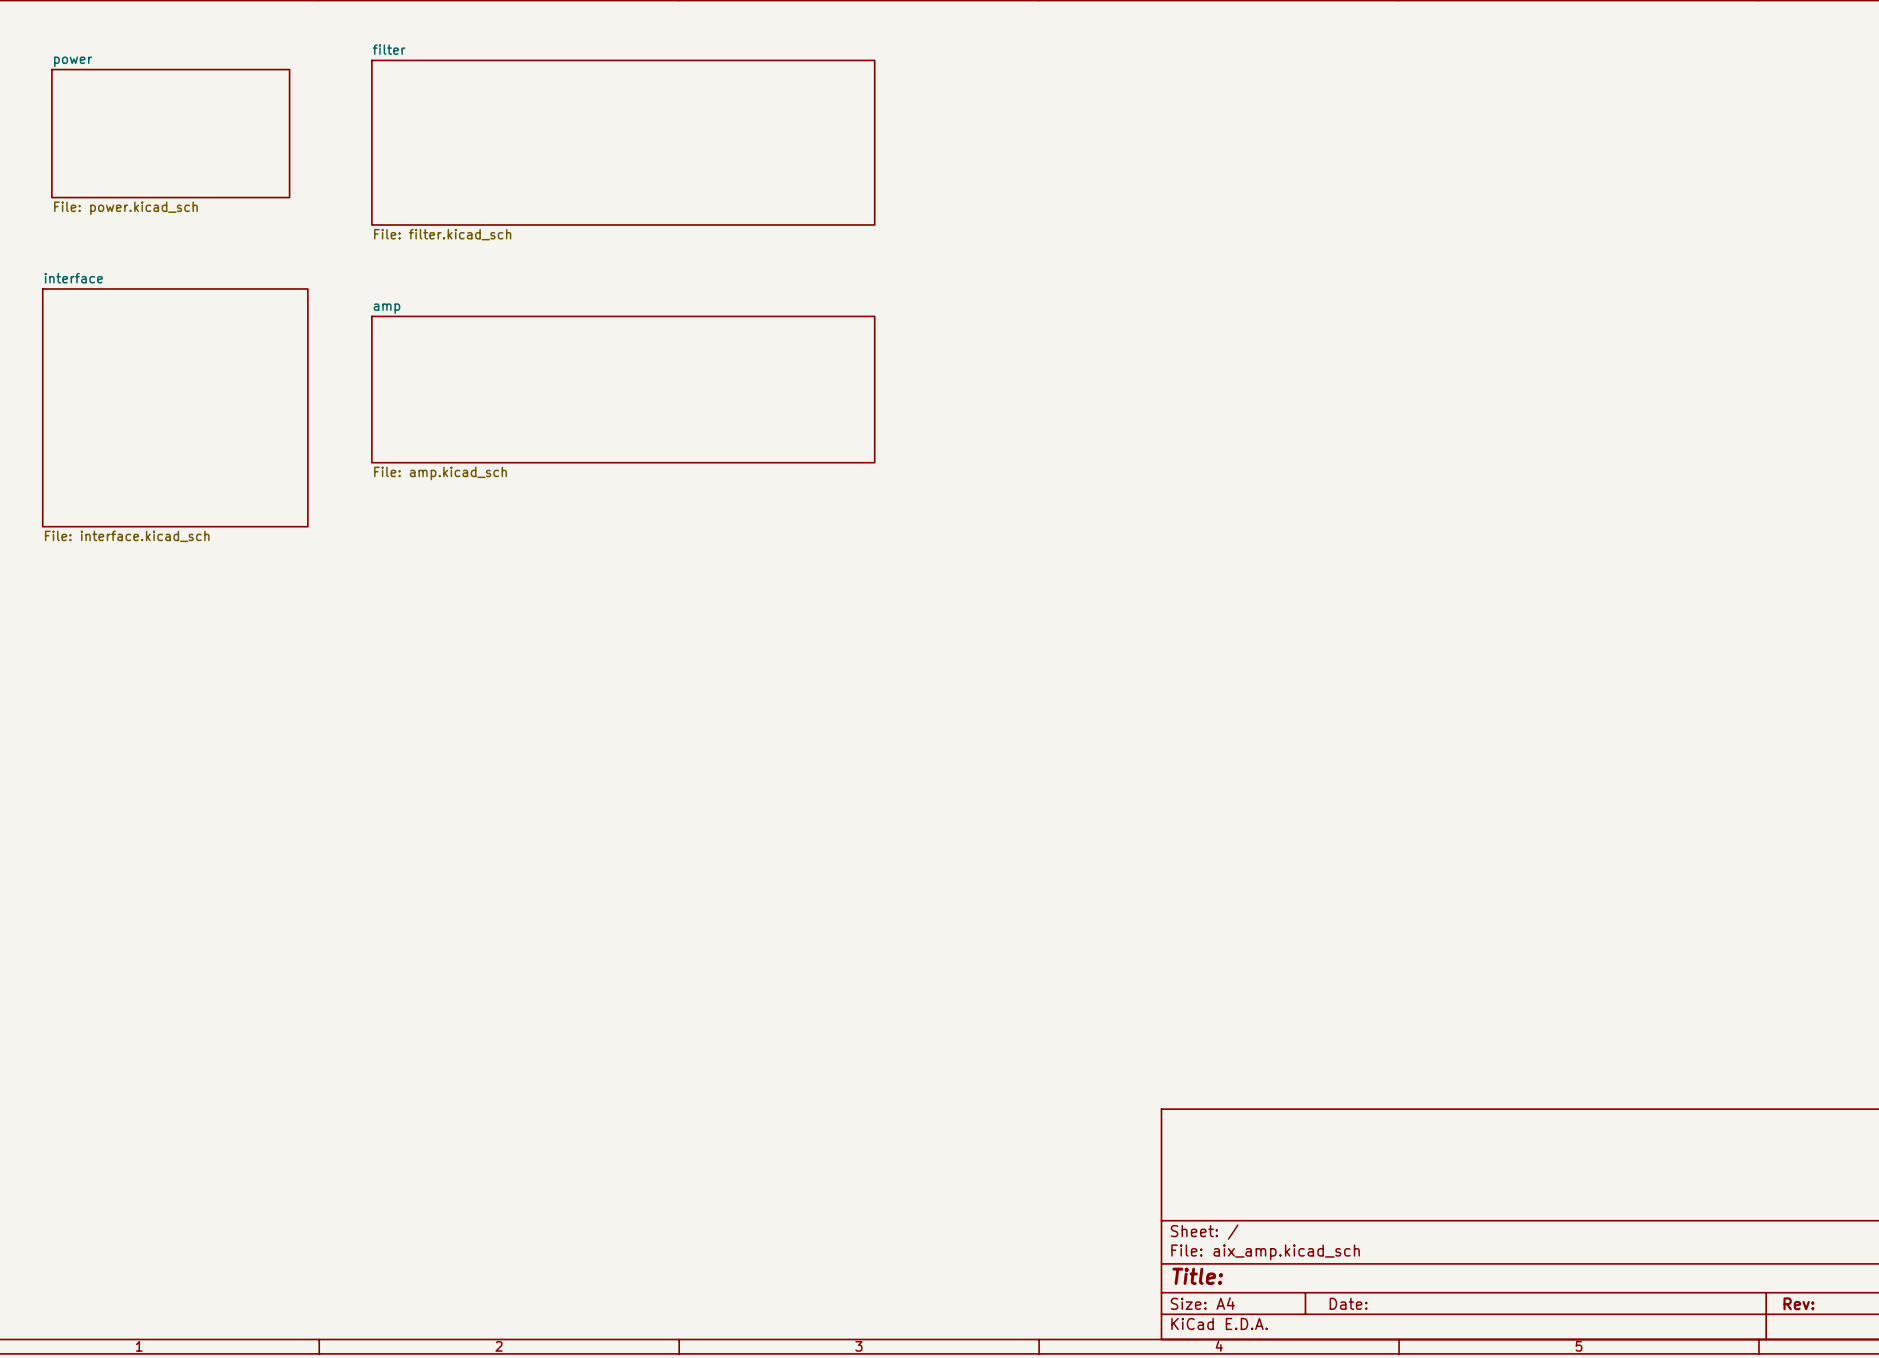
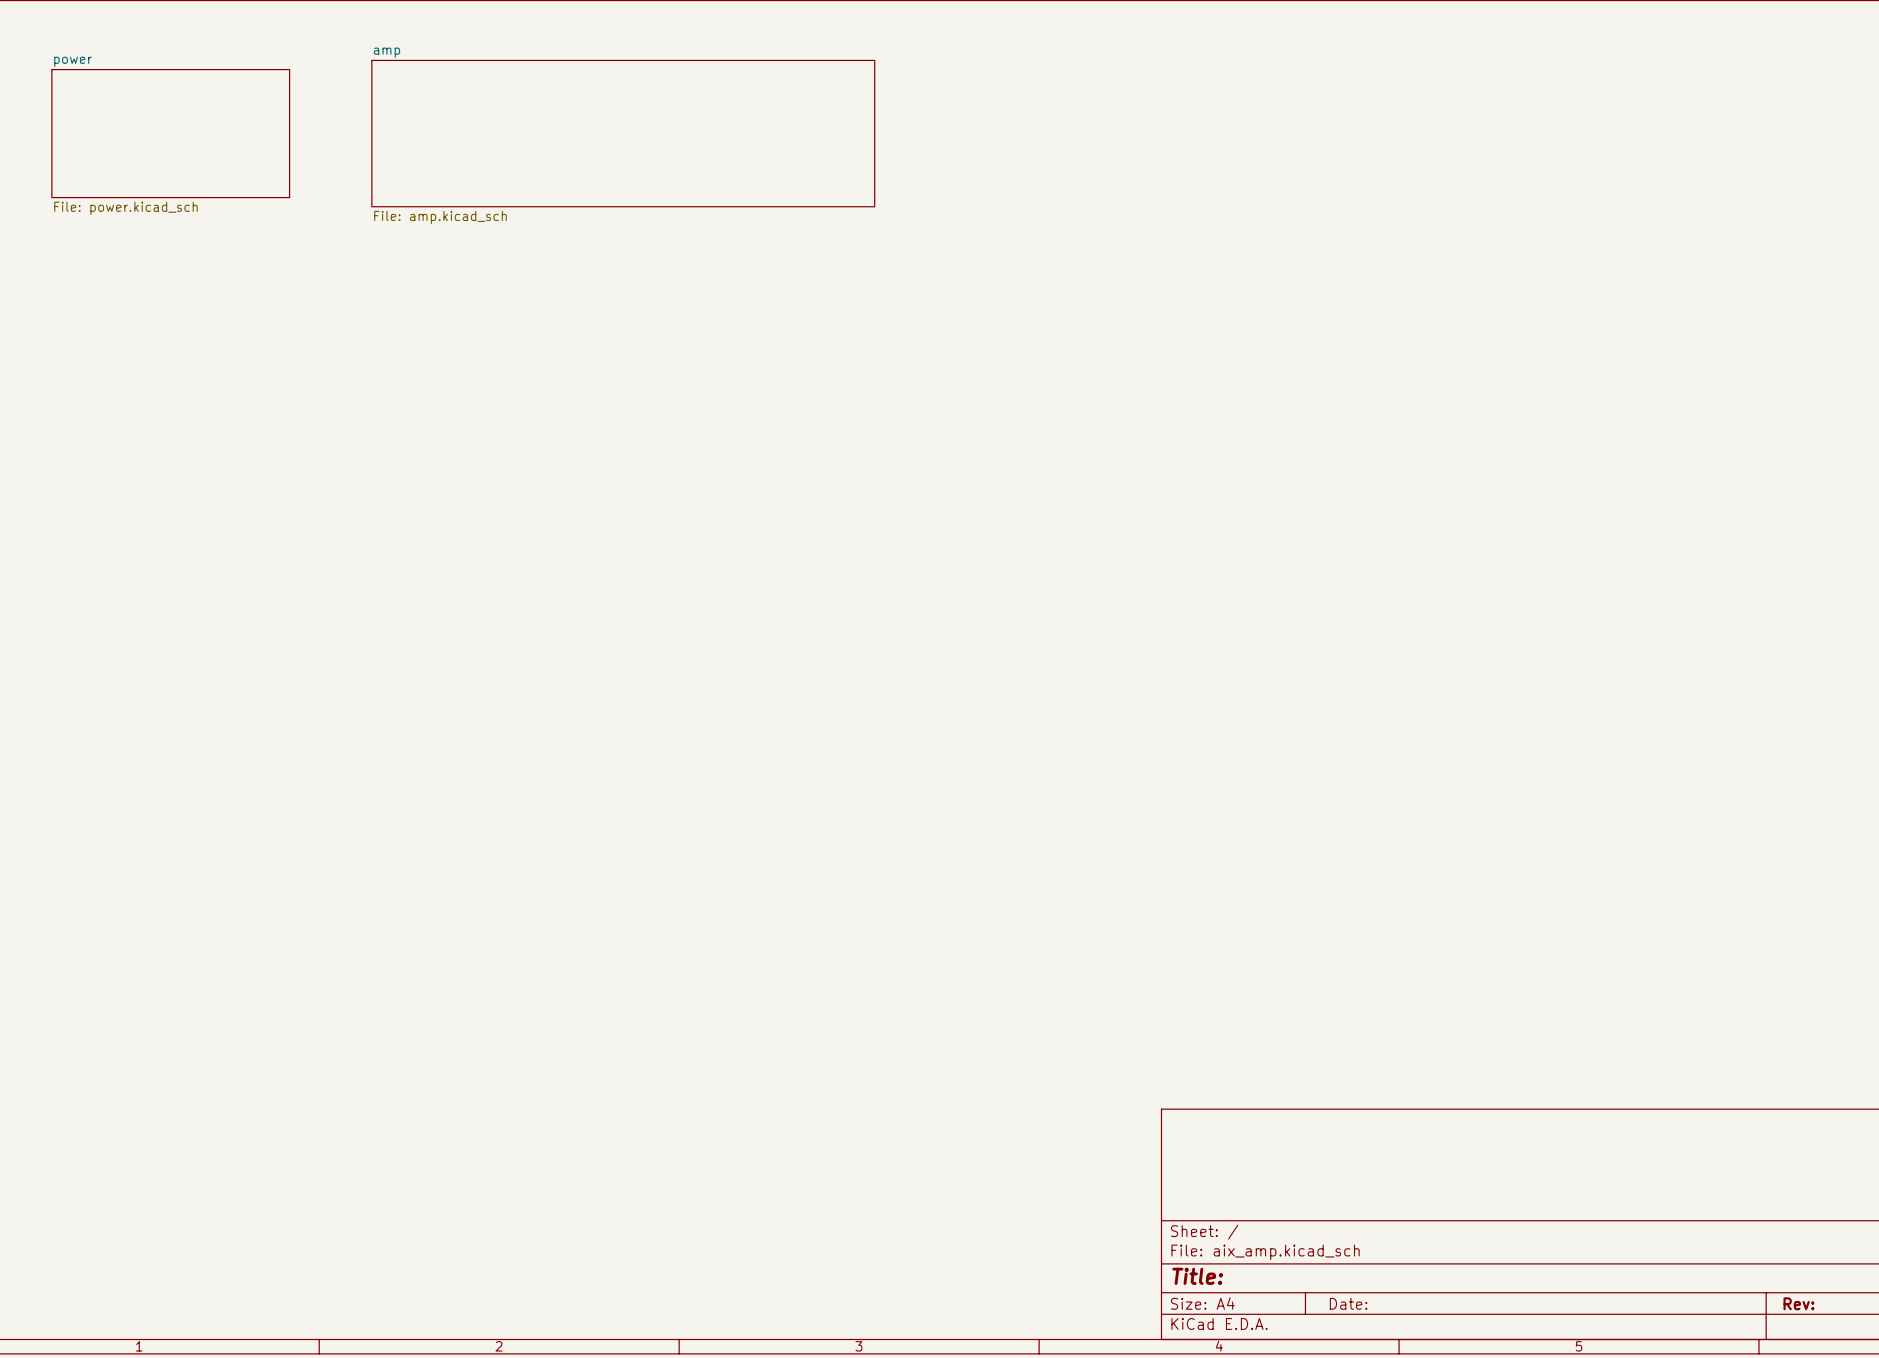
sheet amp: none -> File: amp.kicad_sch (623, 133)
sheet filter: File: filter.kicad_sch (623, 142) -> none
sheet amp: File: amp.kicad_sch (623, 389) -> none
sheet interface: File: interface.kicad_sch (175, 407) -> none

